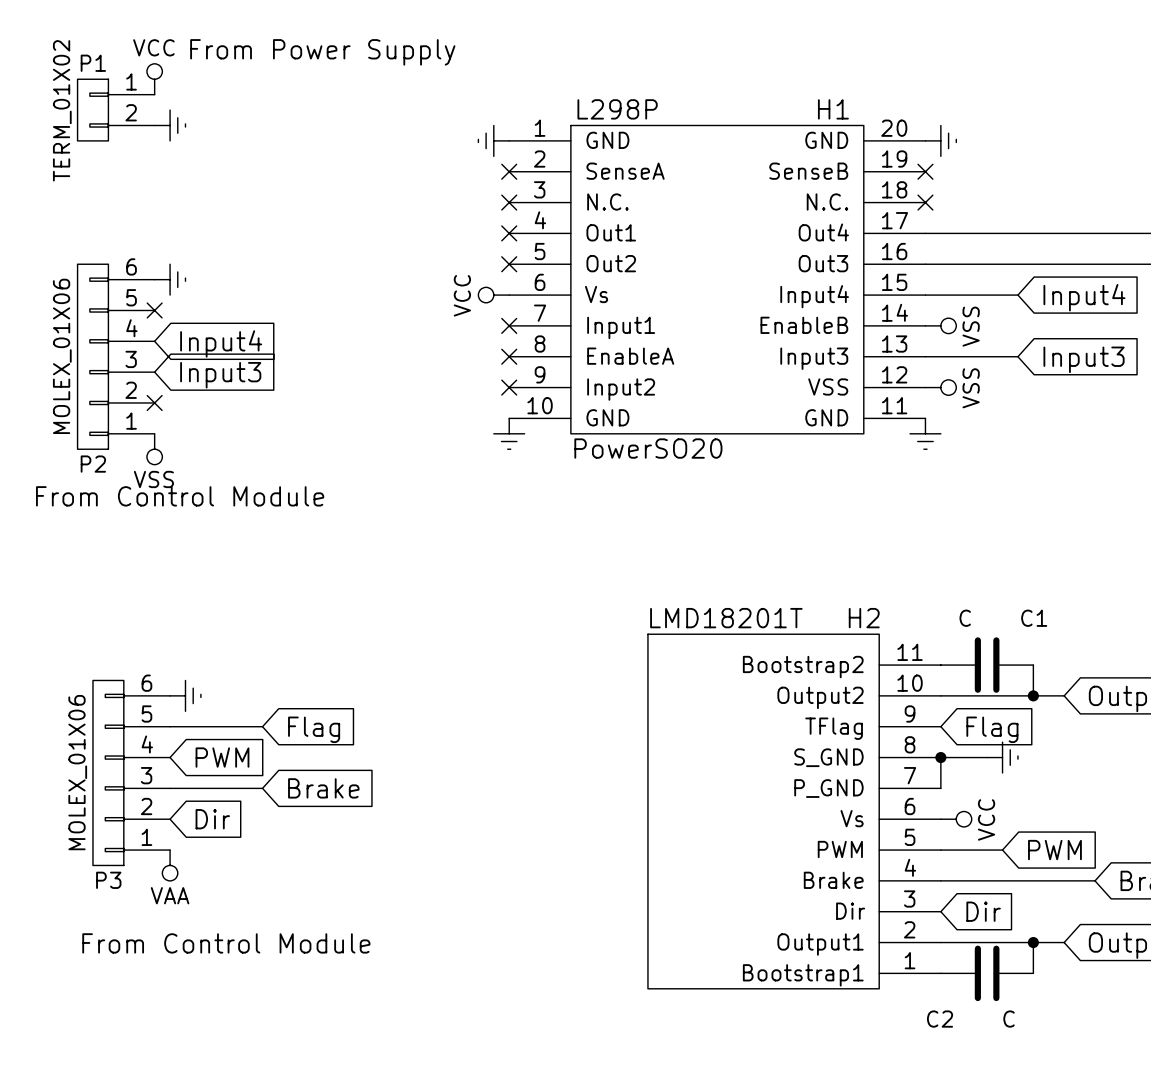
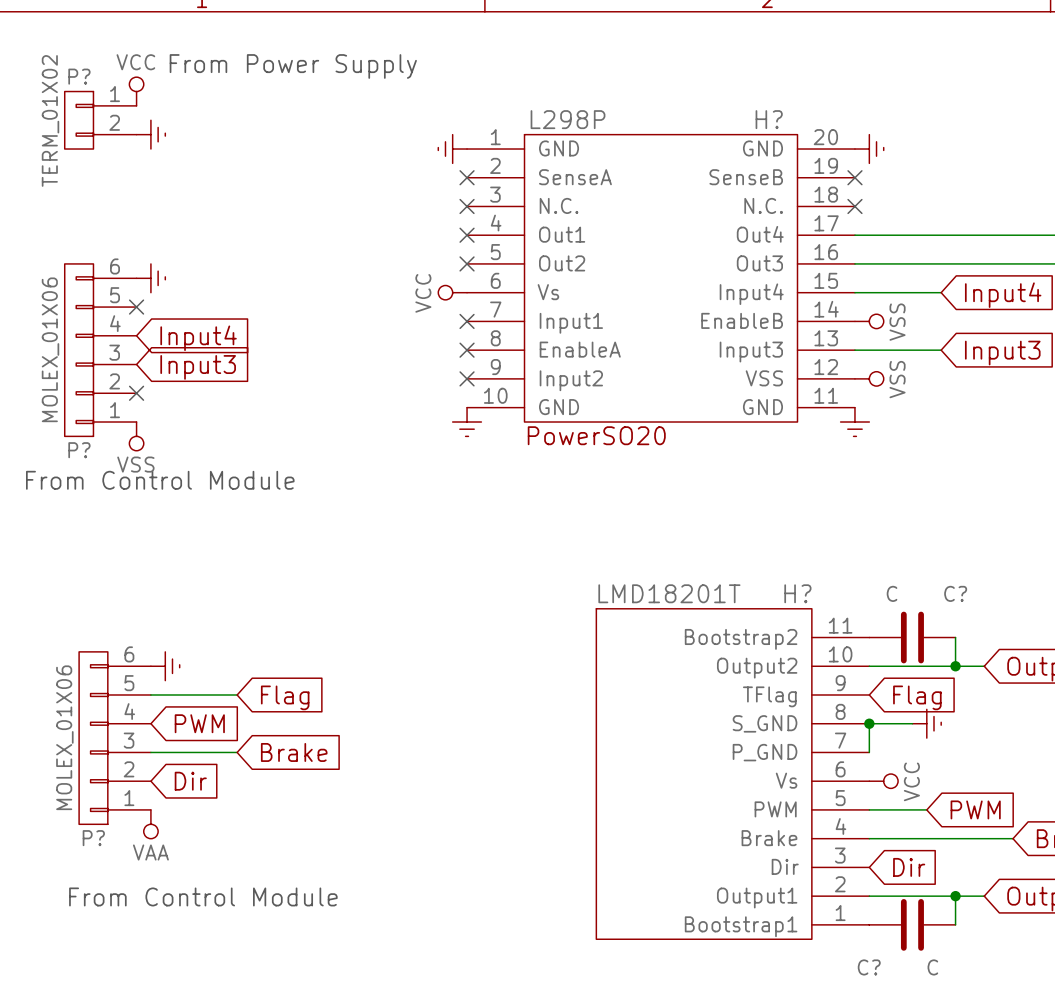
P1 name: P1 (93, 63) -> P? (79, 76)
H1 name: H1 (833, 109) -> H? (769, 119)
P2 name: P2 (93, 464) -> P? (79, 450)
H2 name: H2 (864, 618) -> H? (797, 593)
C1 name: C1 (1034, 618) -> C? (955, 593)
P3 name: P3 (108, 880) -> P? (93, 838)
C2 name: C2 (940, 1019) -> C? (869, 967)

